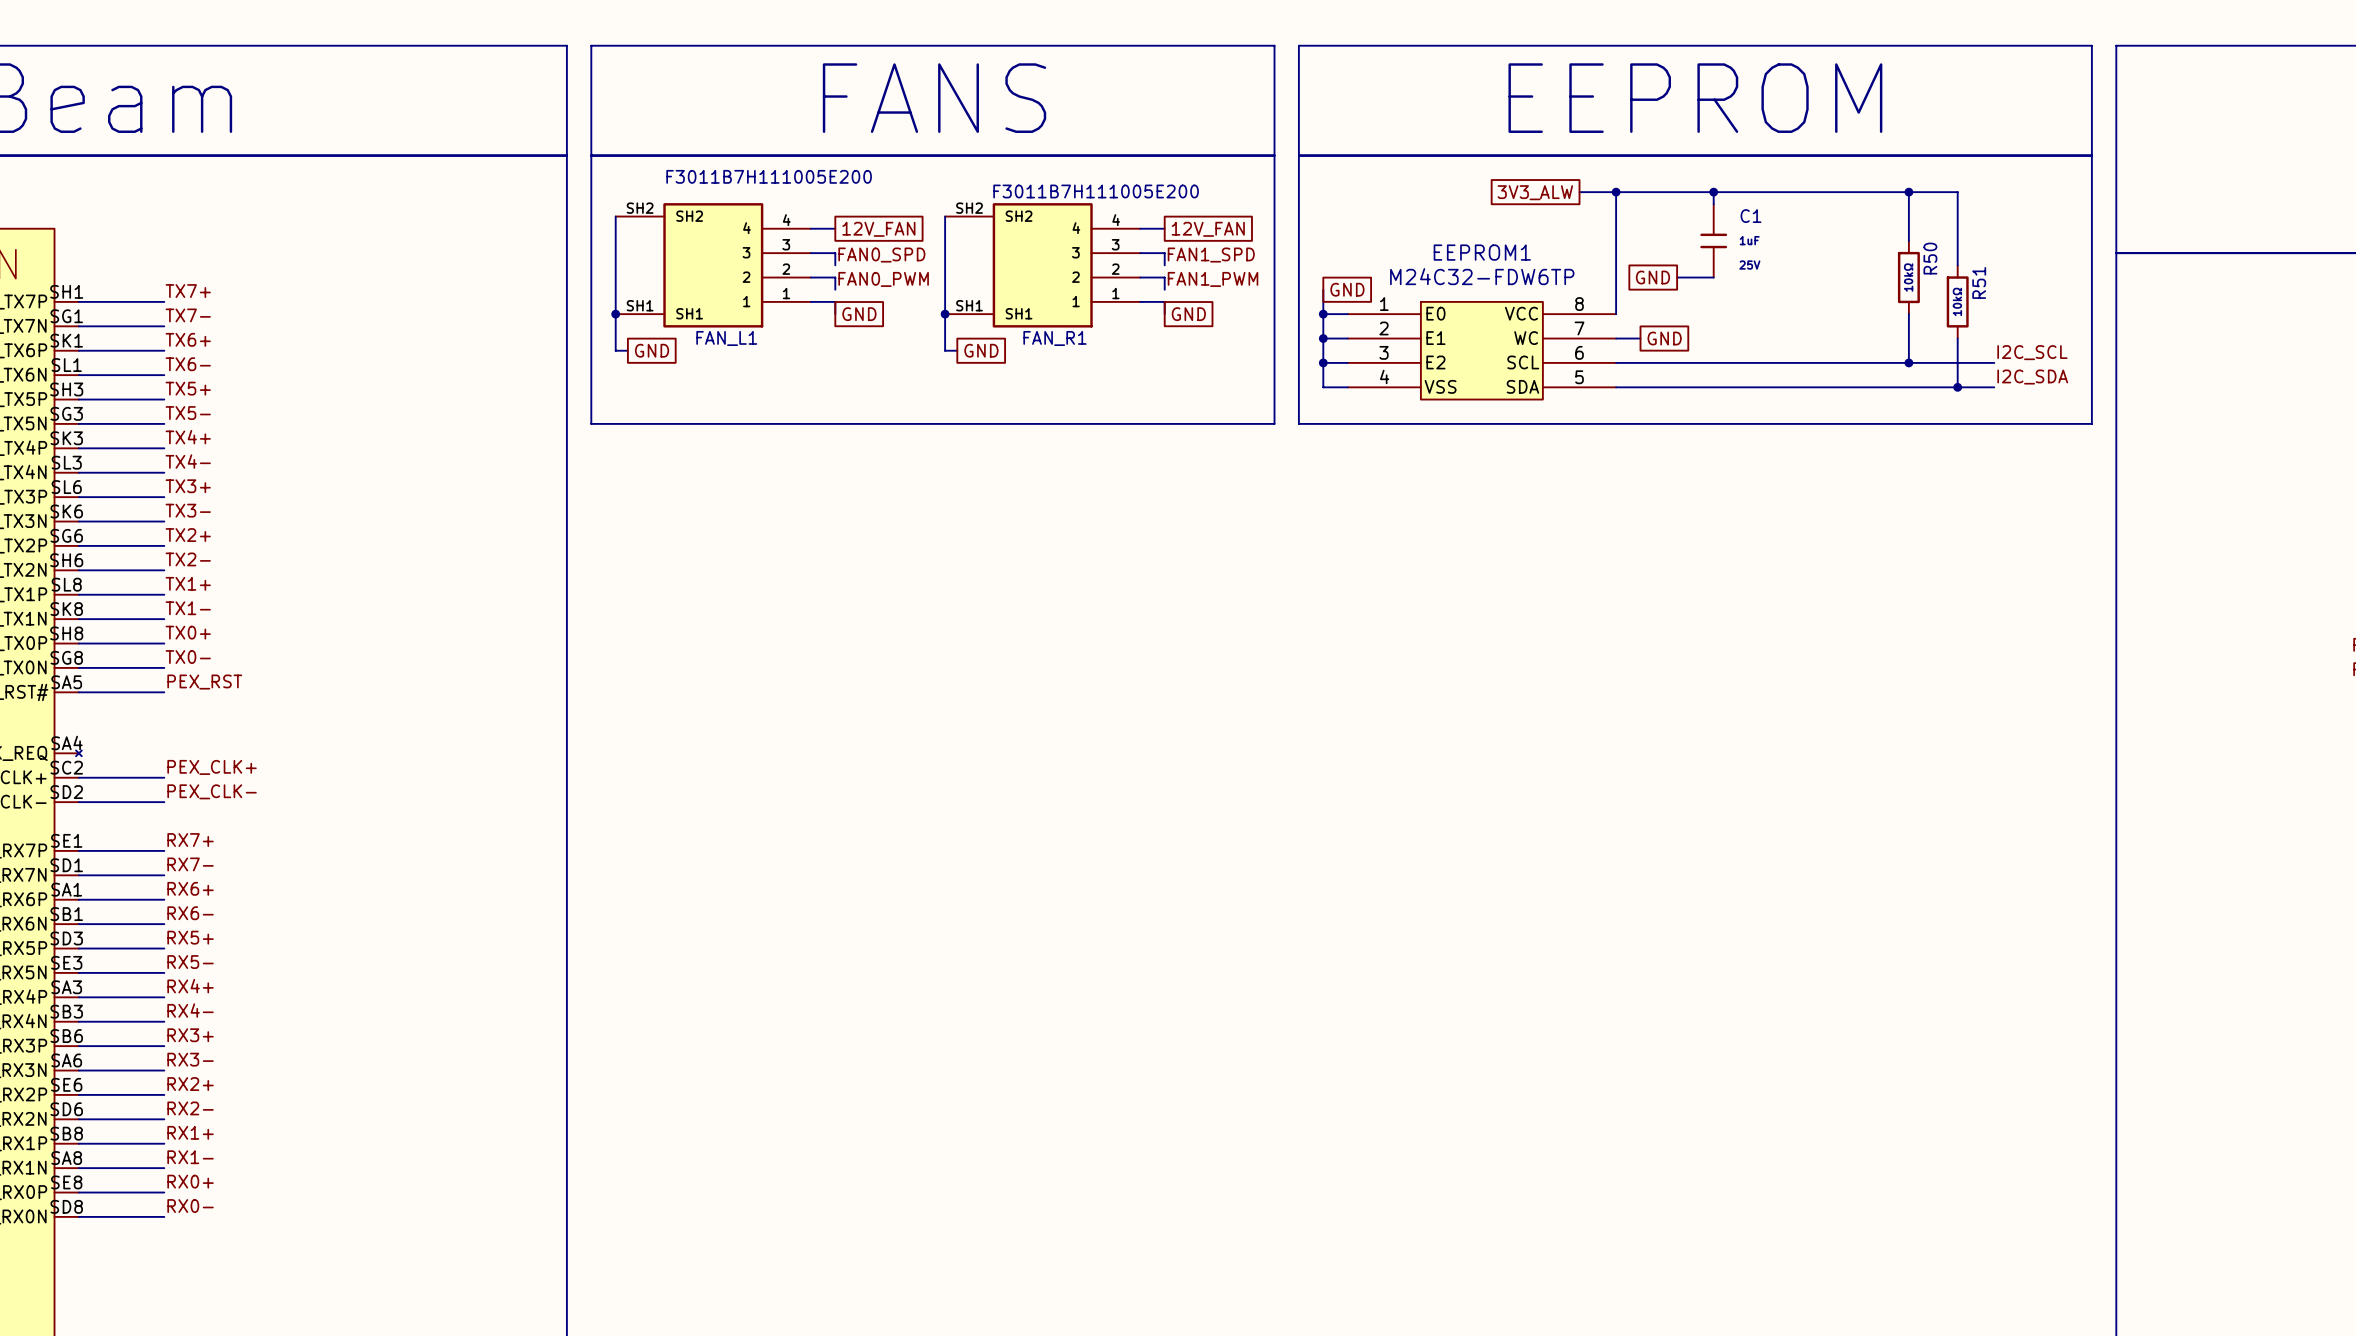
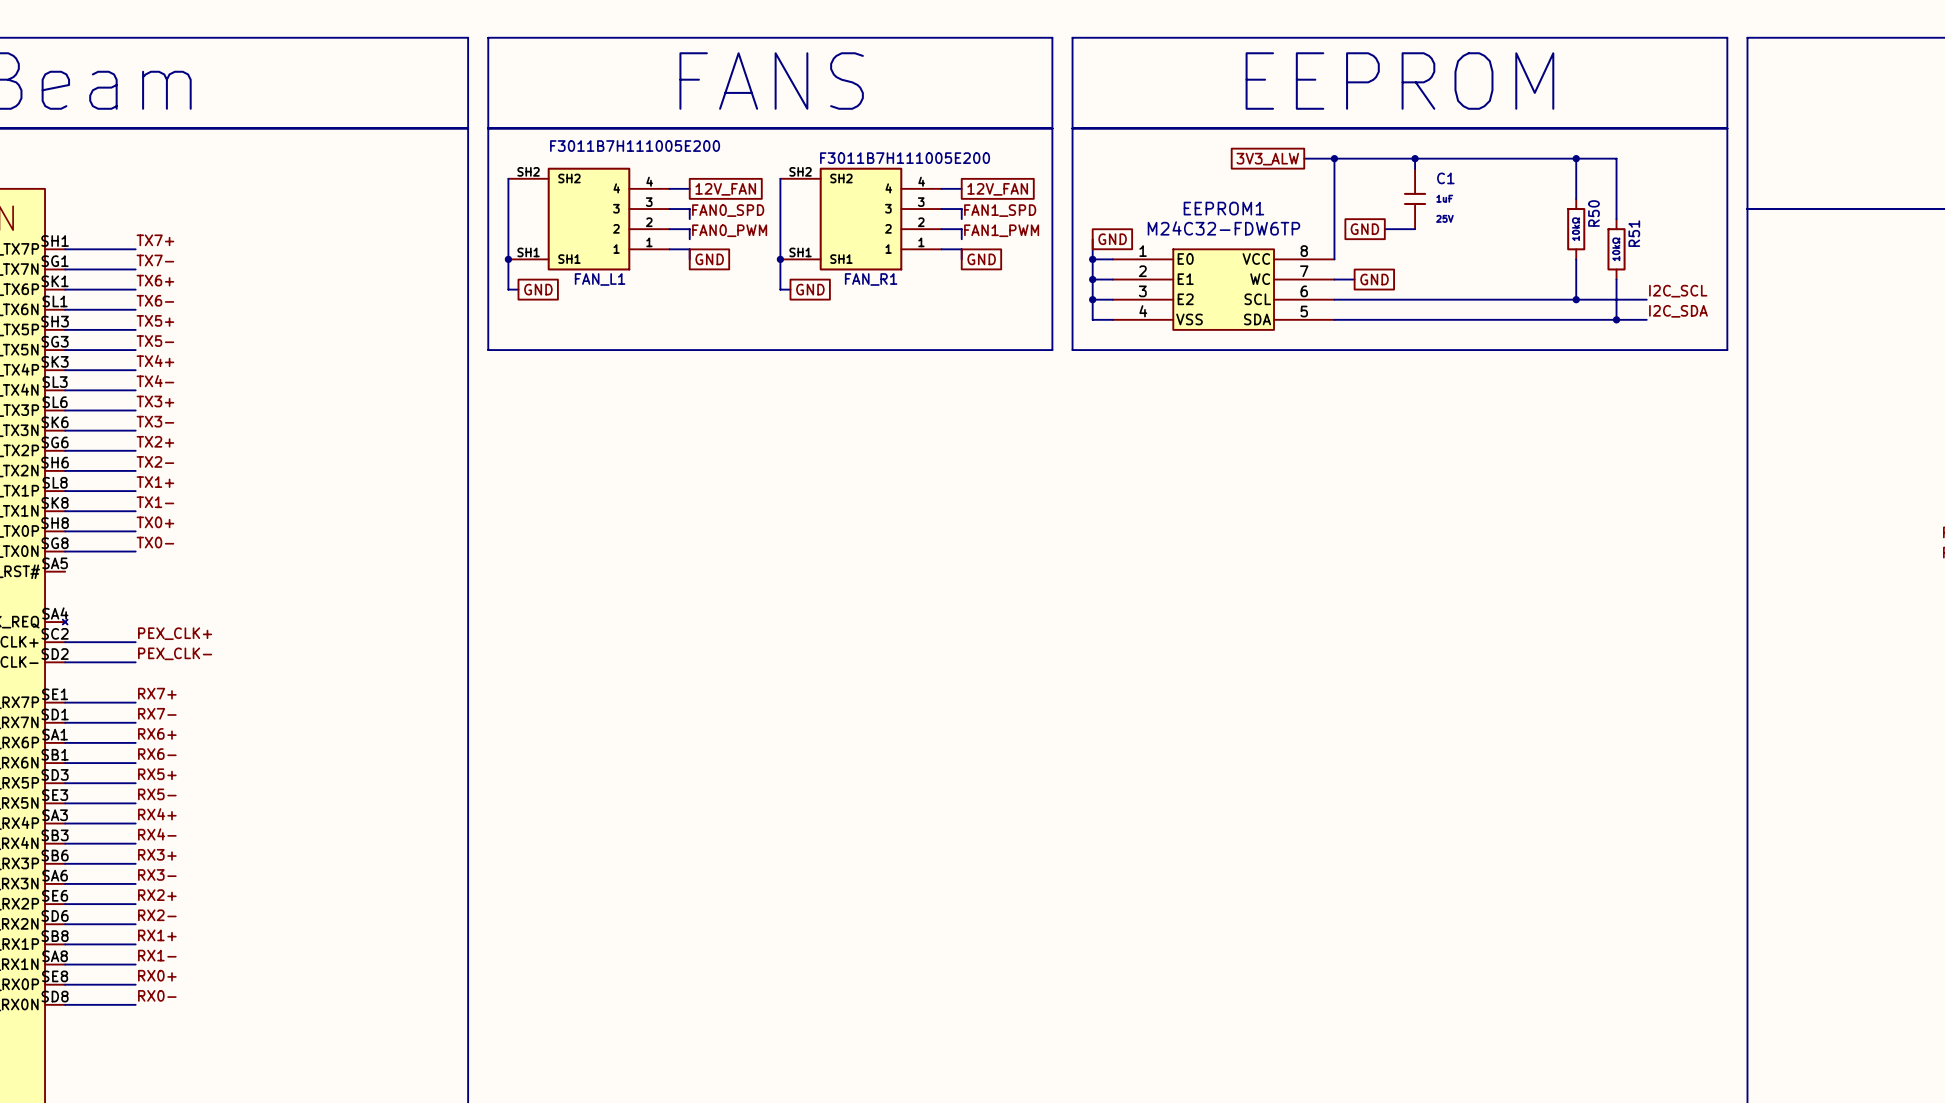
label: PEX_RST (204, 682) -> none
wire: (78, 692) (164, 692) -> none

